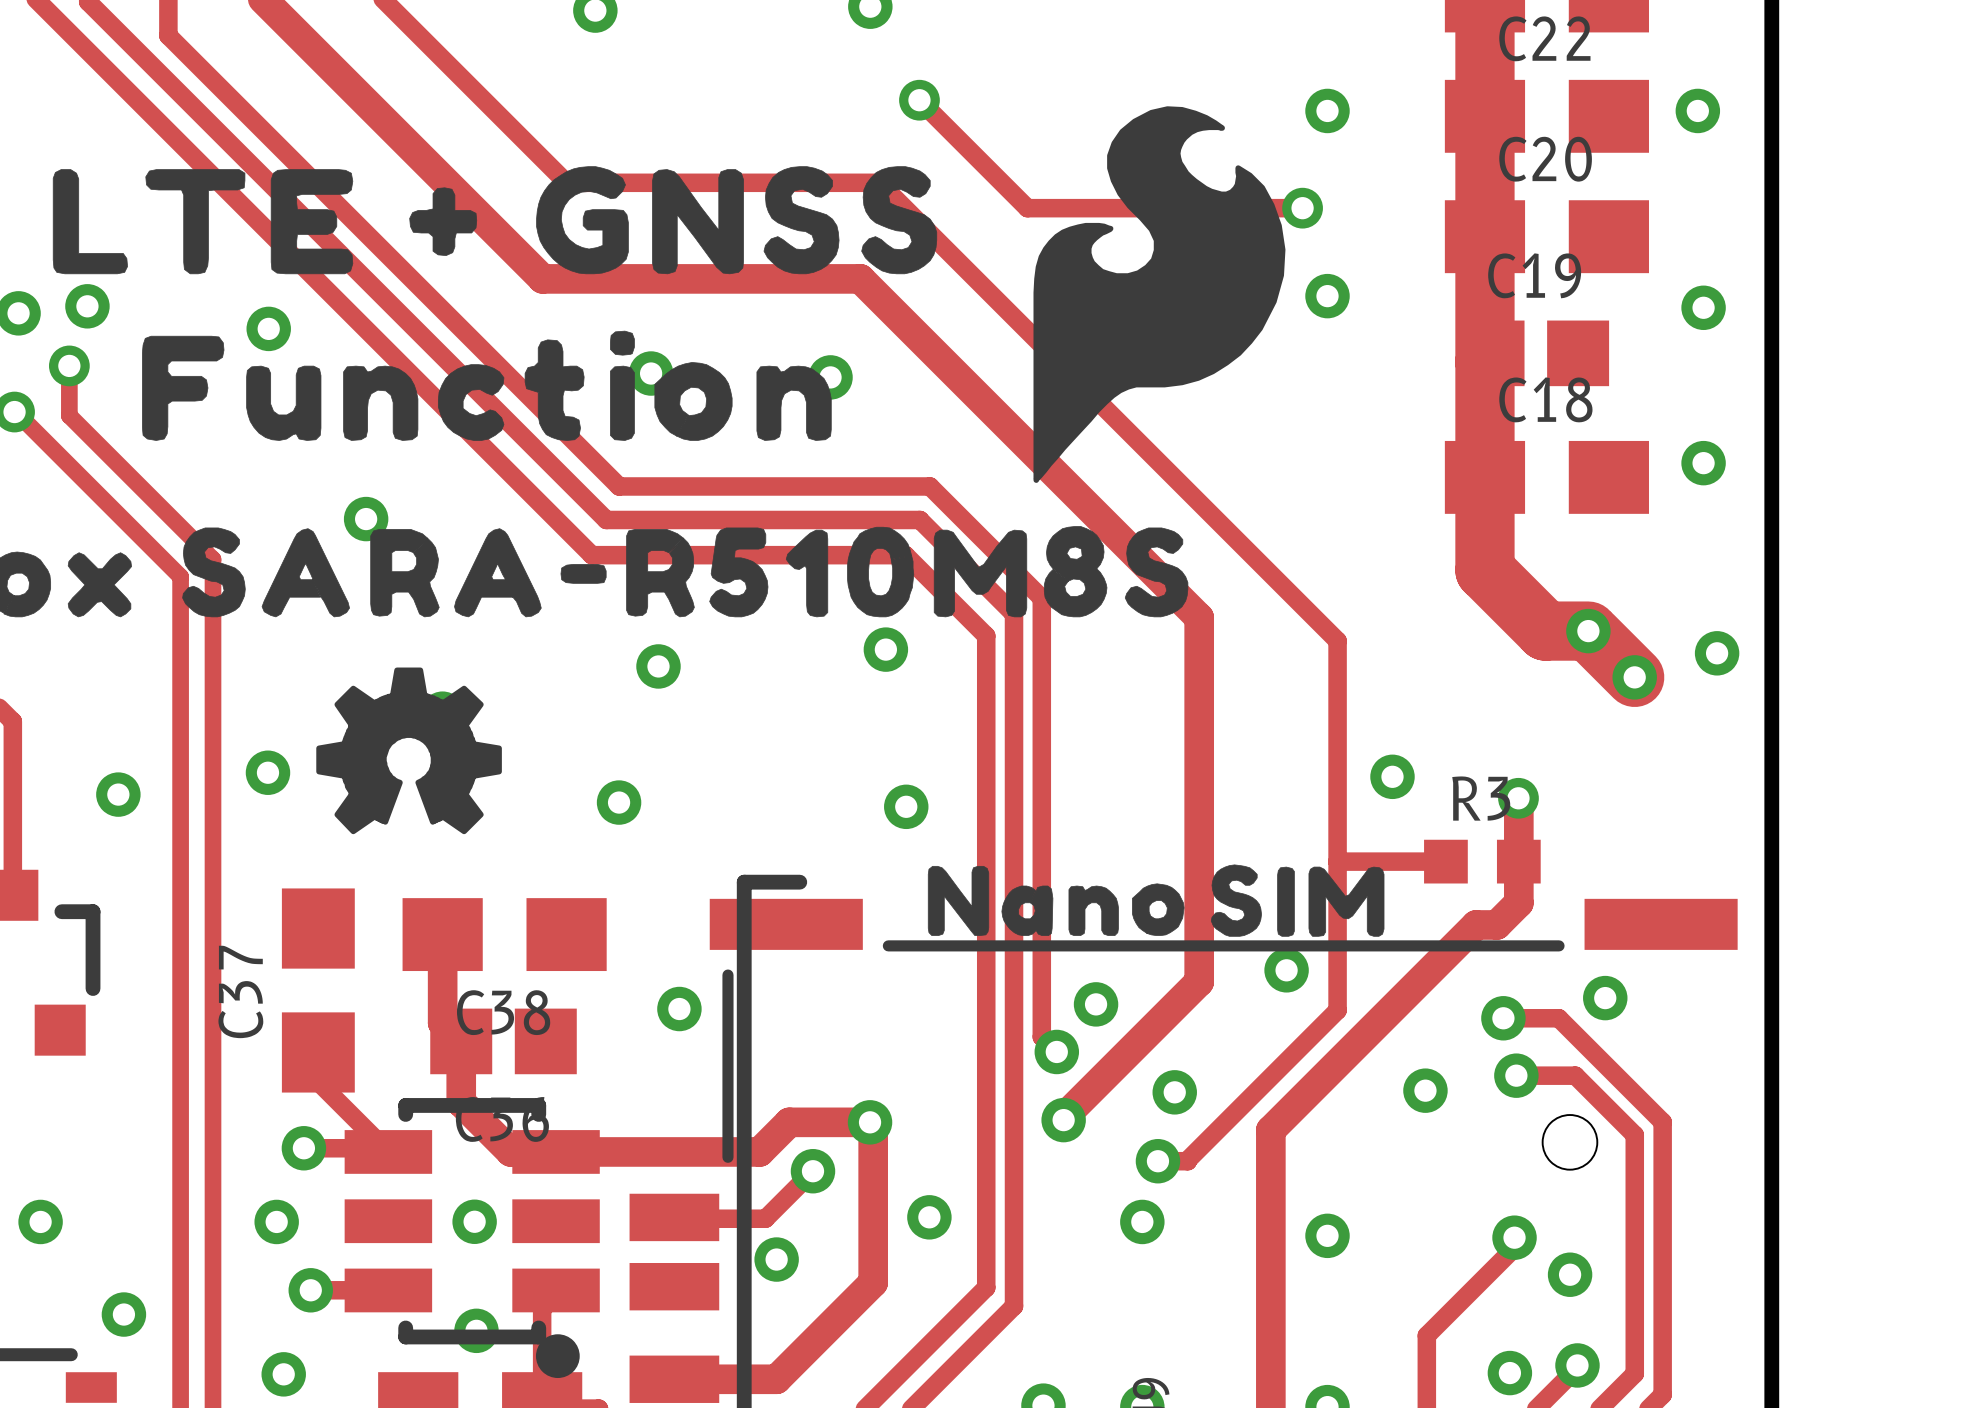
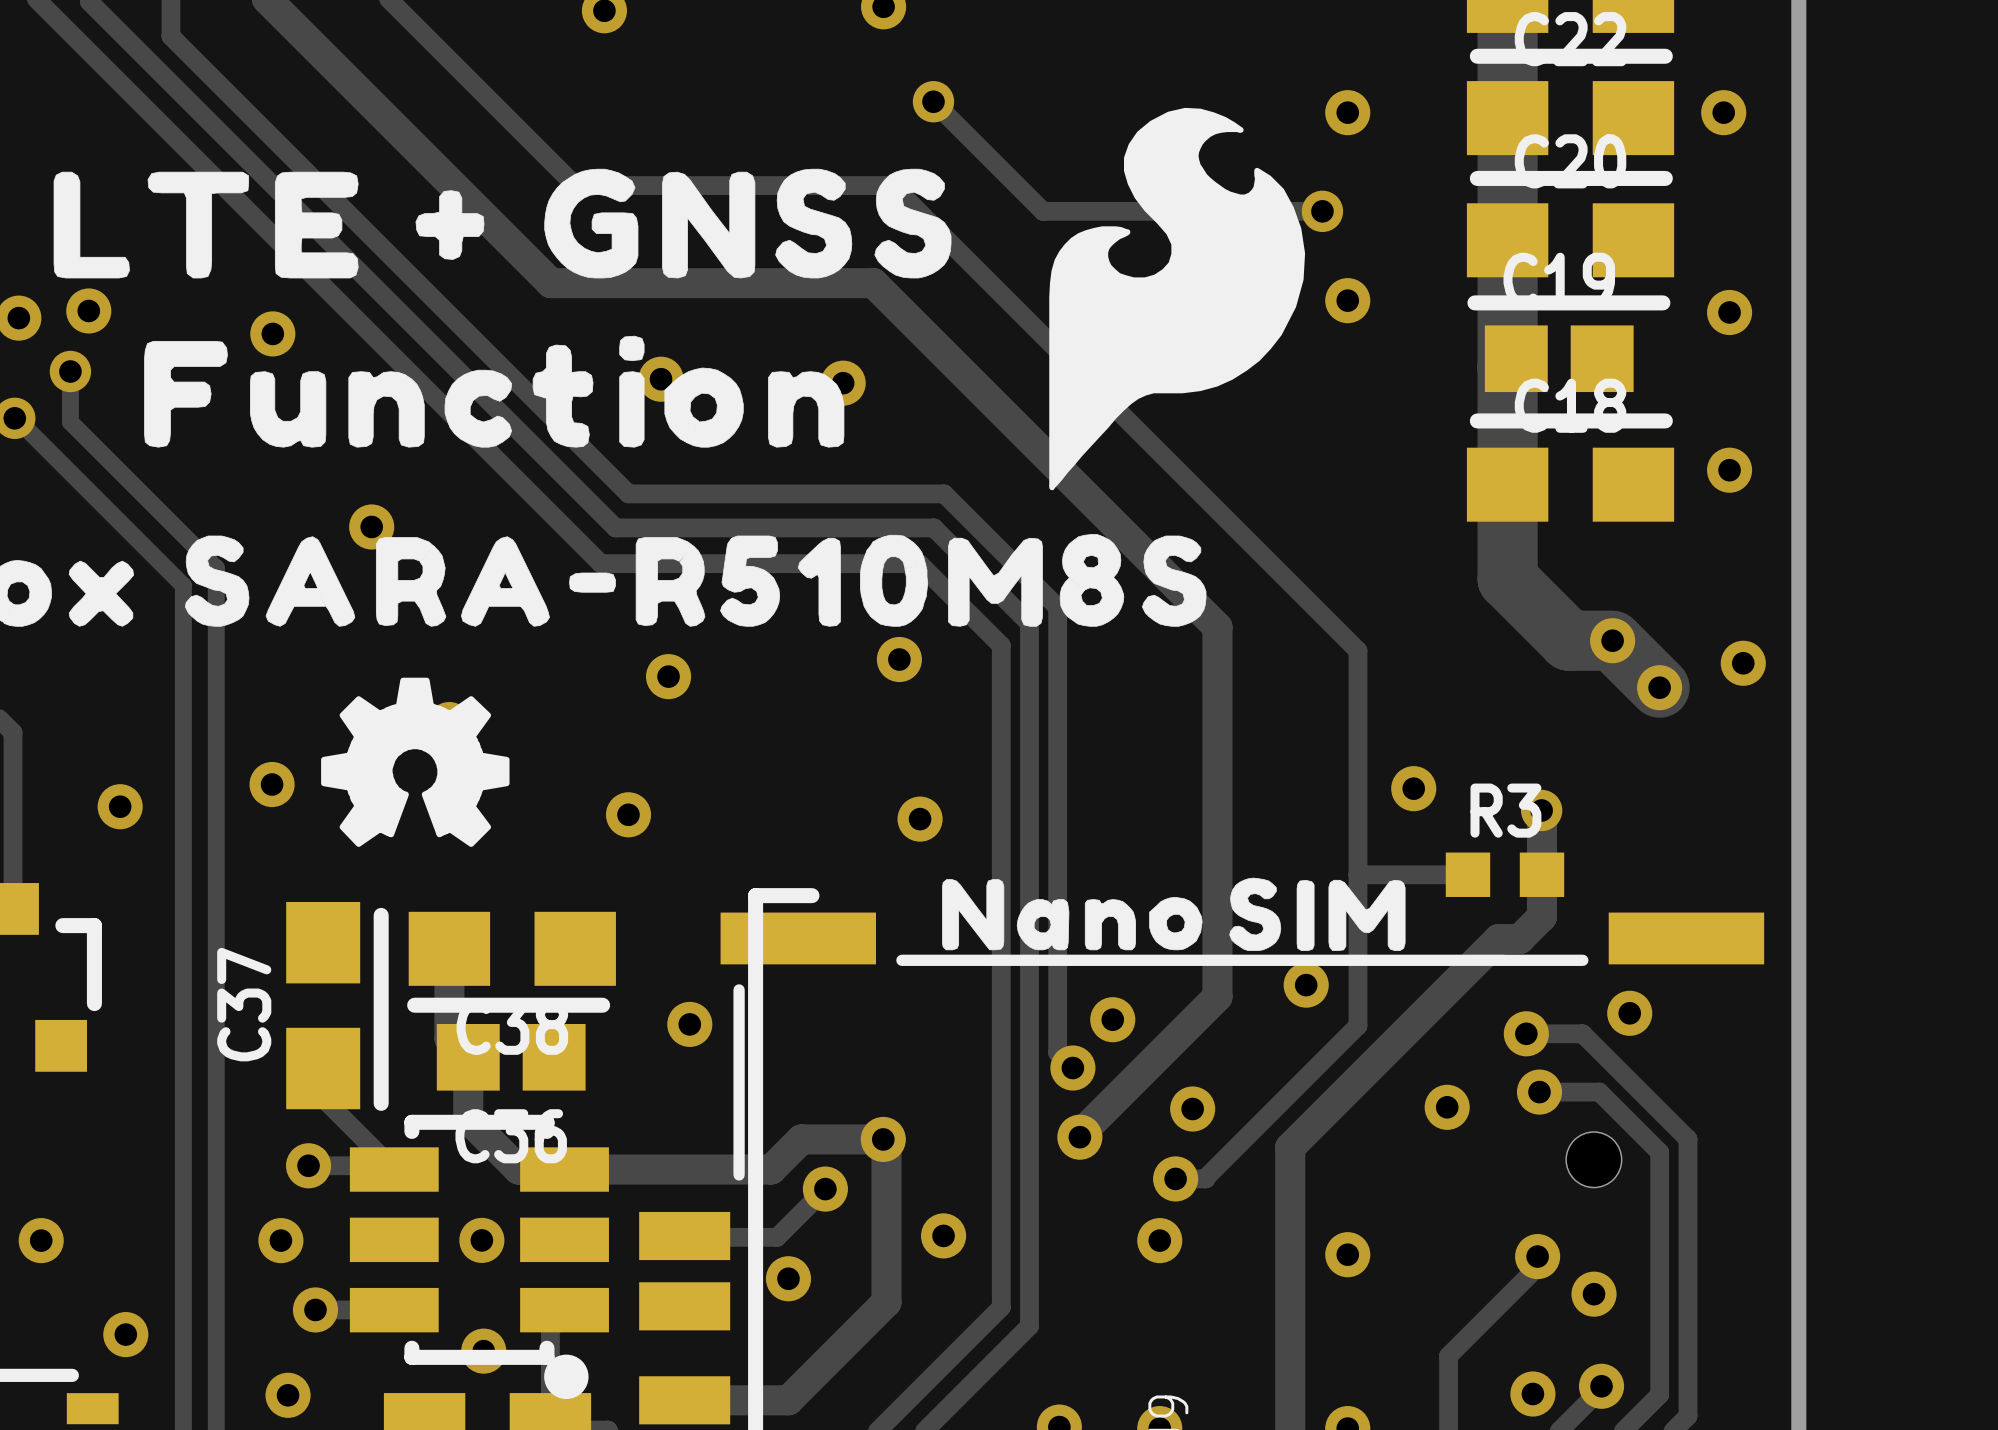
line: none -> (1477, 56) (1665, 56)
line: none -> (1477, 178) (1665, 178)
line: none -> (1474, 302) (1662, 302)
line: none -> (1477, 420) (1665, 420)
line: none -> (381, 915) (381, 1103)
line: none -> (414, 1005) (602, 1005)

